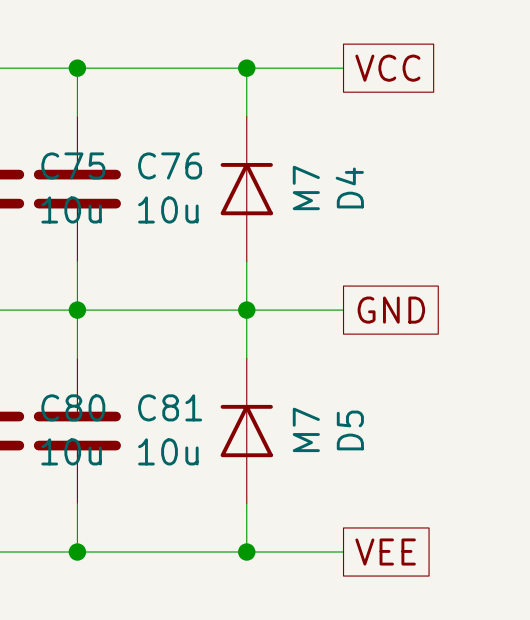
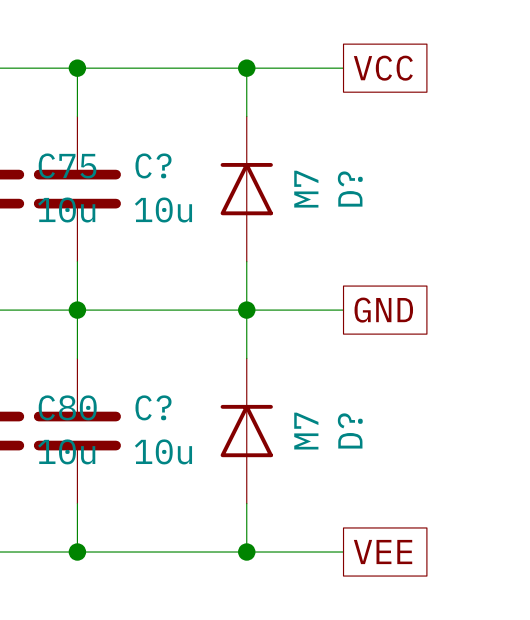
C76 name: C76 (170, 165) -> C? (153, 165)
D4 name: D4 (349, 187) -> D? (350, 189)
C81 name: C81 (170, 407) -> C? (153, 407)
D5 name: D5 (350, 430) -> D? (350, 430)

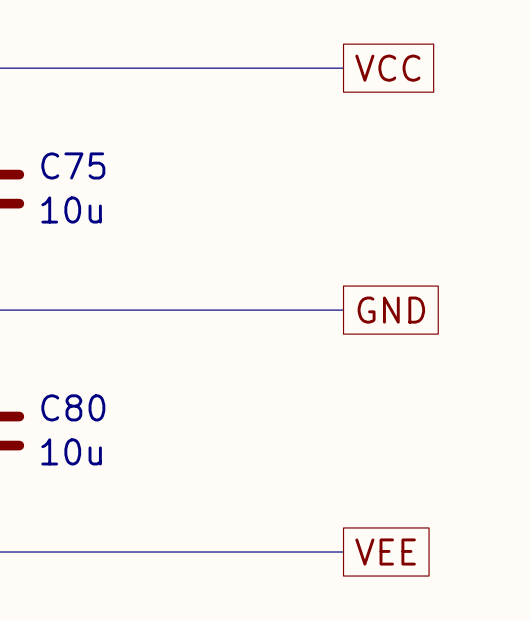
wire: (77, 68) (77, 116) -> none
junction: (77, 68) -> none
wire: (246, 68) (246, 116) -> none
junction: (246, 68) -> none
C?: 10u (77, 189) -> none
D?: M7 (246, 189) -> none
wire: (77, 261) (77, 358) -> none
wire: (246, 261) (246, 358) -> none
junction: (77, 310) -> none
junction: (246, 310) -> none
C?: 10u (77, 431) -> none
D?: M7 (246, 431) -> none
wire: (77, 503) (77, 552) -> none
wire: (246, 503) (246, 552) -> none
junction: (77, 552) -> none
junction: (246, 552) -> none

